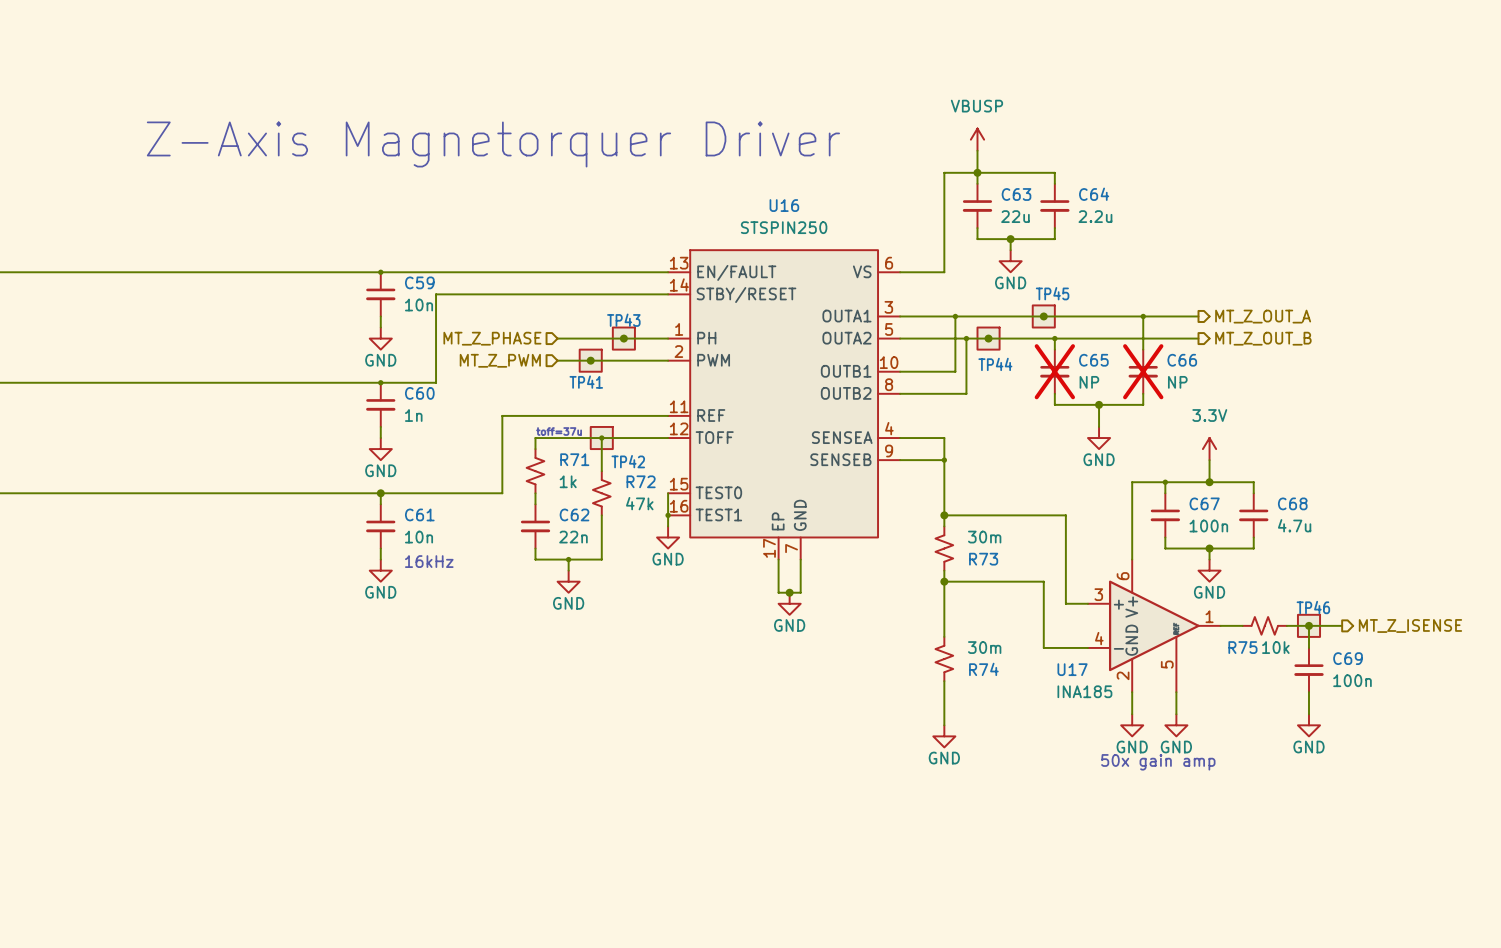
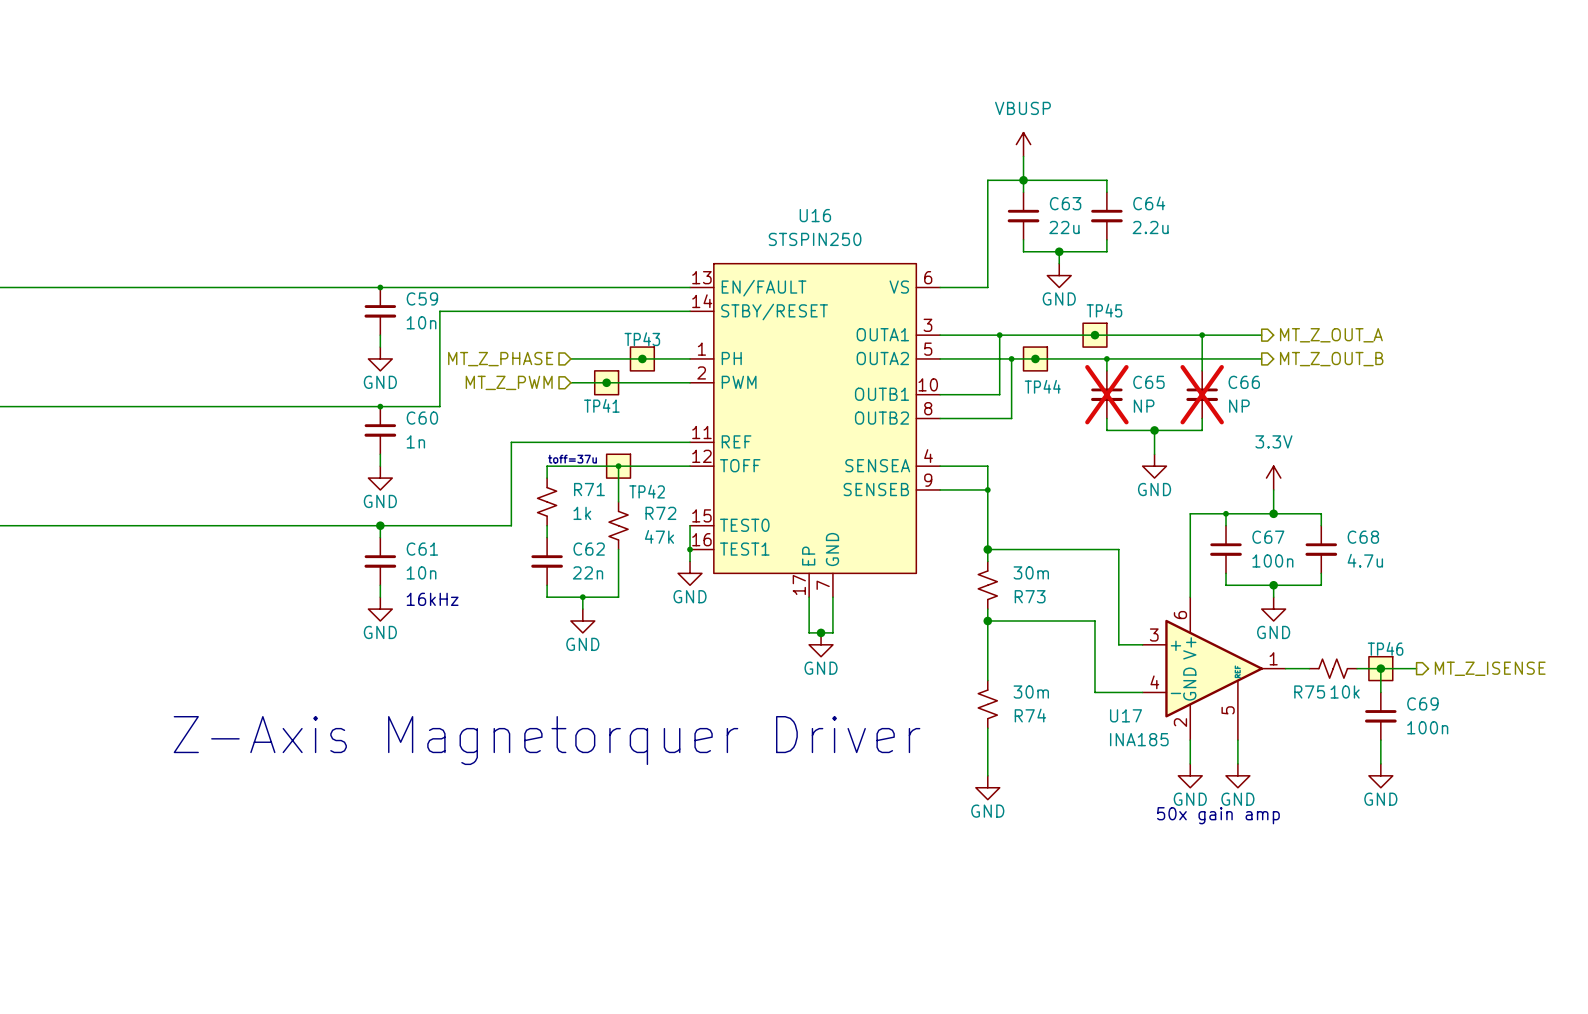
text: Z-Axis Magnetorquer Driver (493, 144) -> none
text: none -> Z-Axis Magnetorquer Driver (547, 740)

